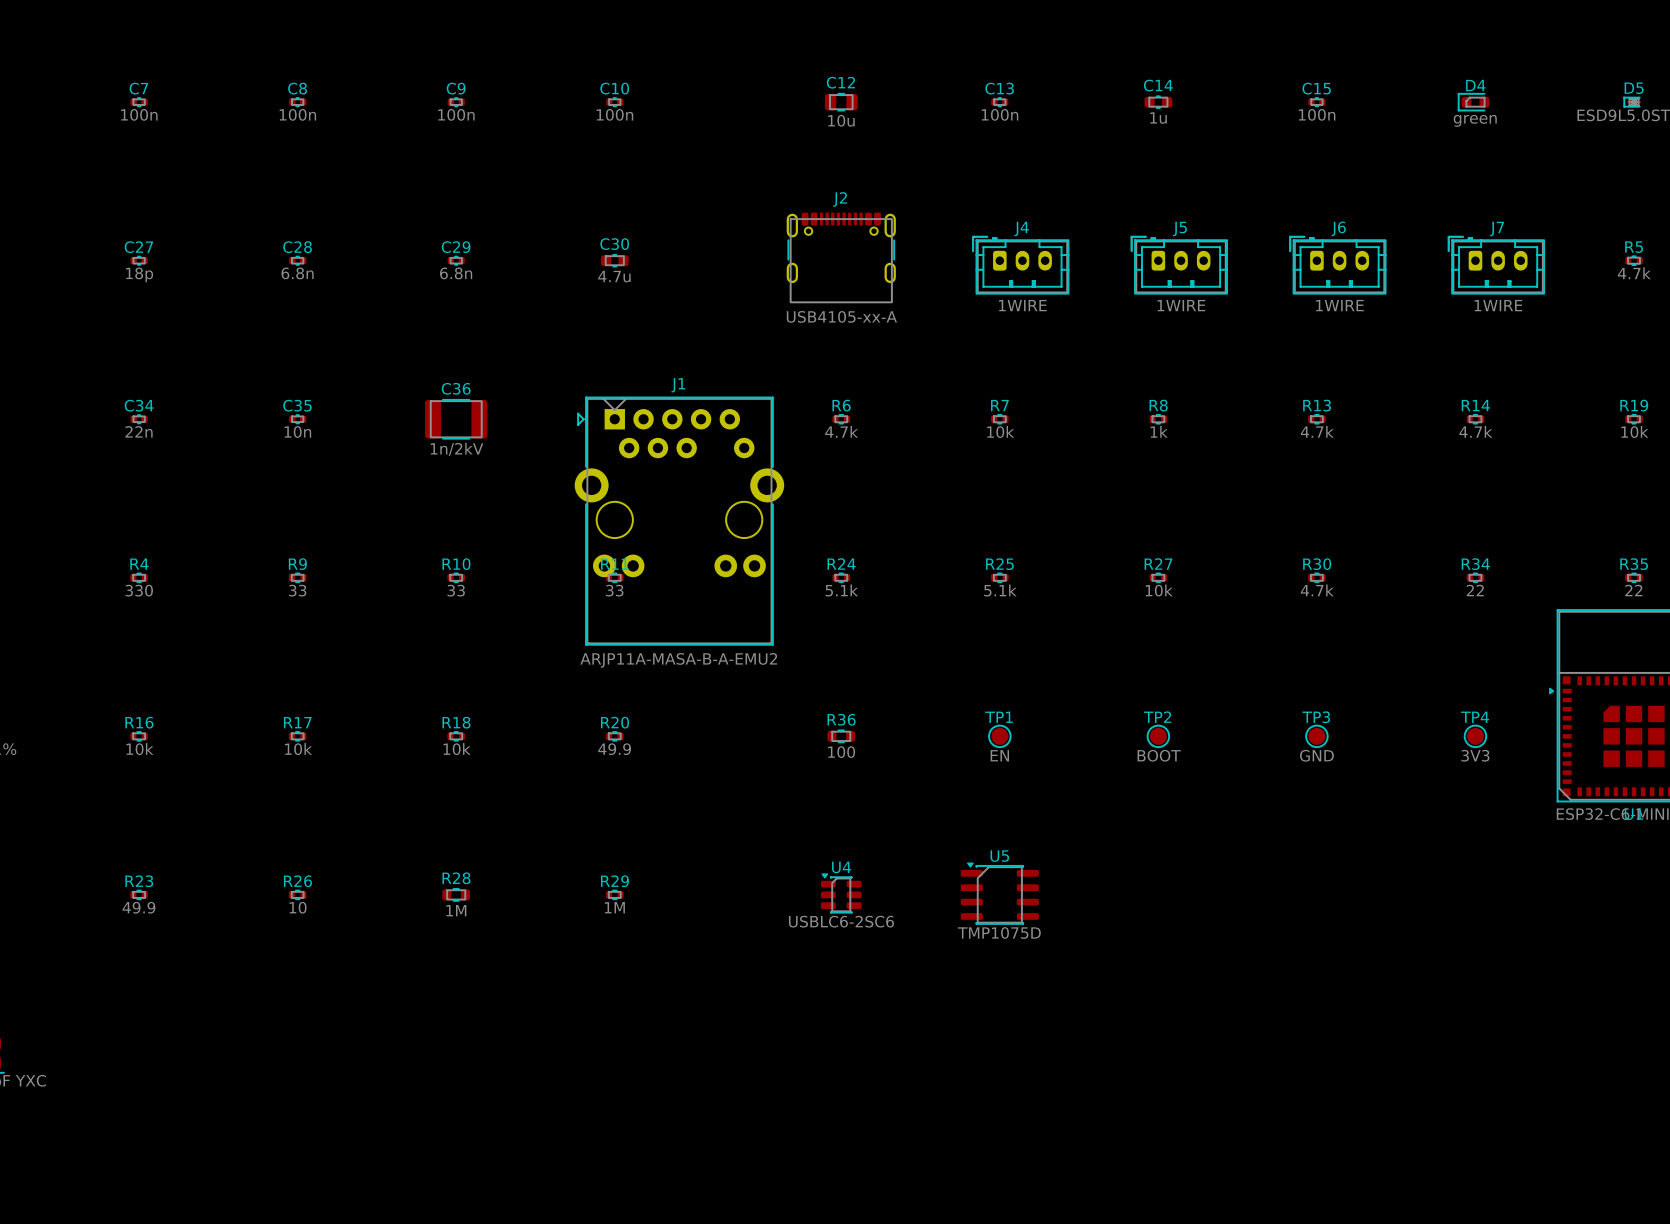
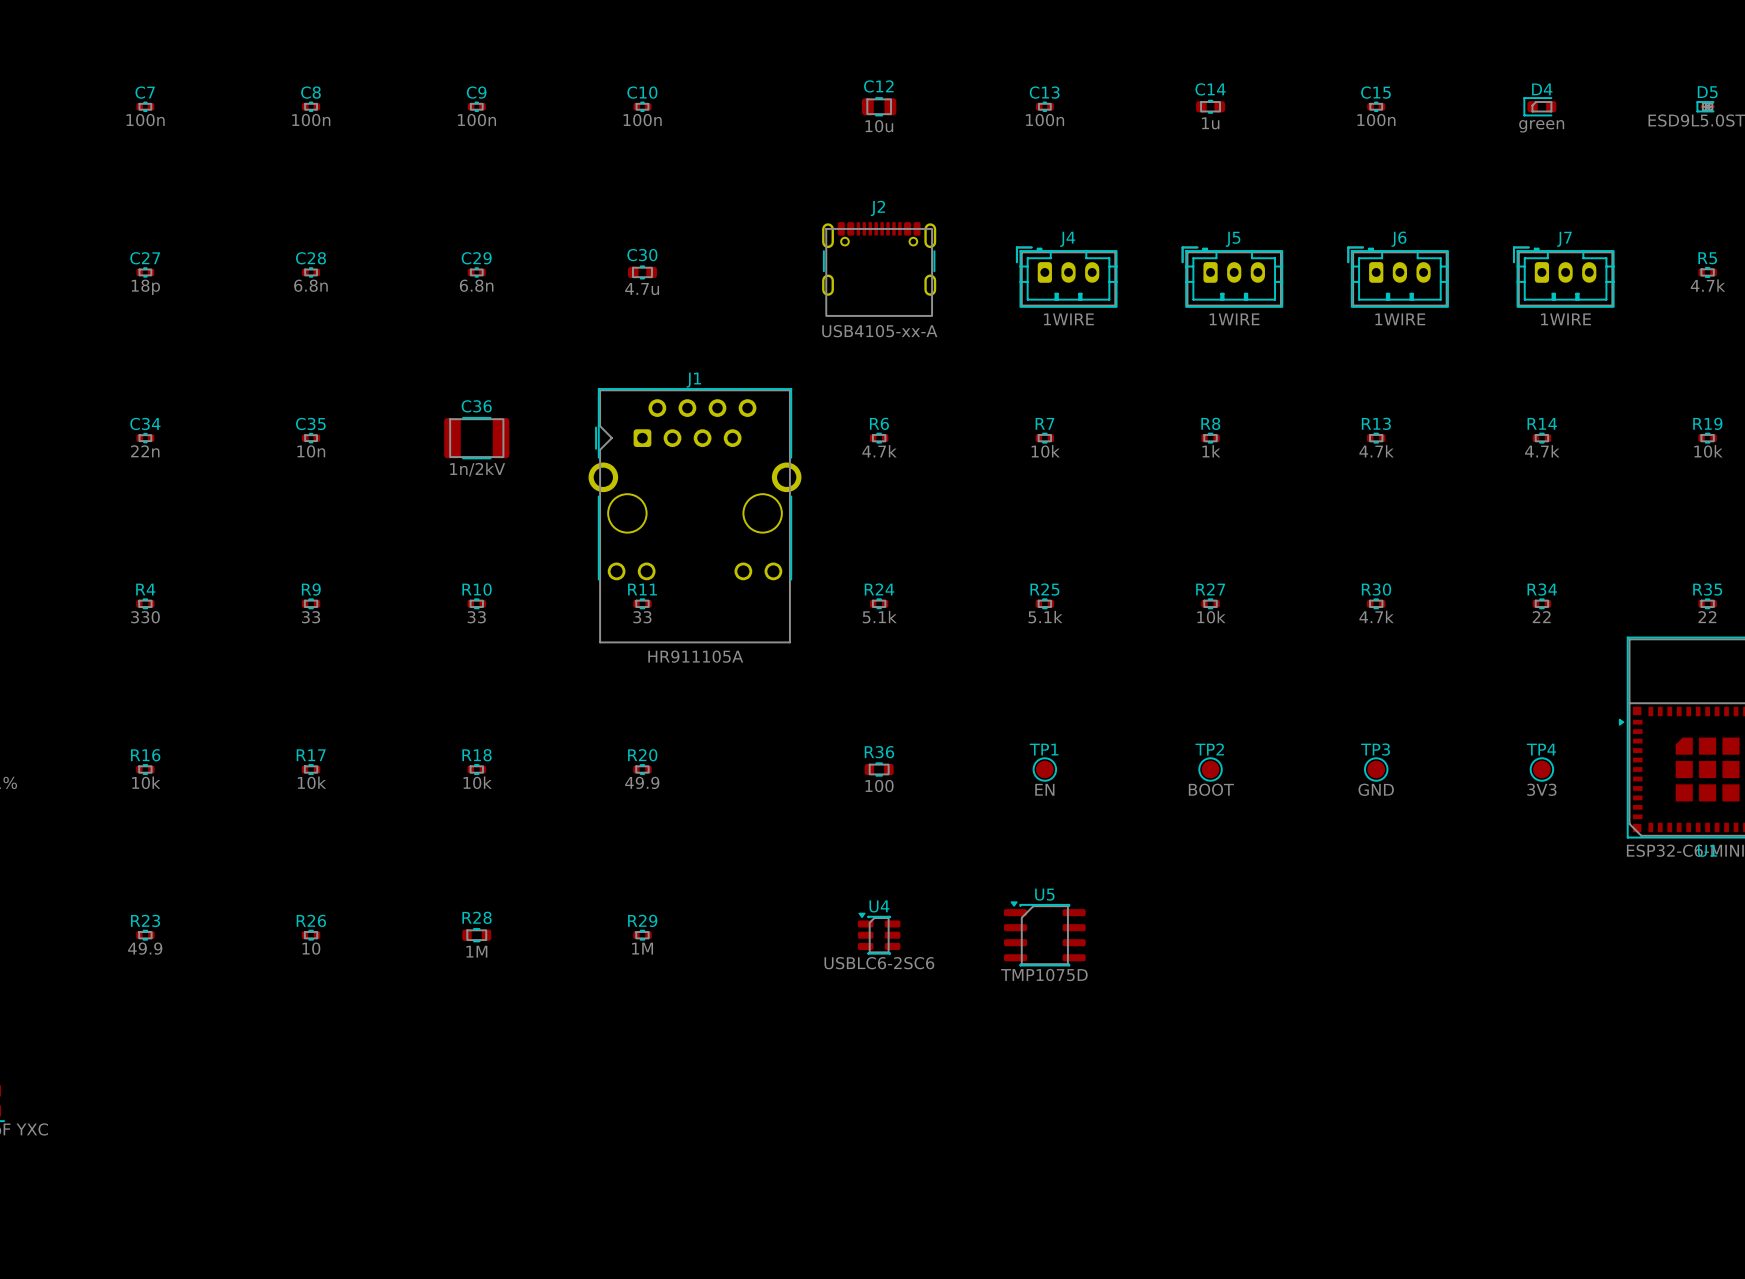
J1 footprint: [574, 396, 785, 646] -> [588, 388, 802, 643]
J1 value: ARJP11A-MASA-B-A-EMU2 (678, 660) -> HR911105A (695, 656)

